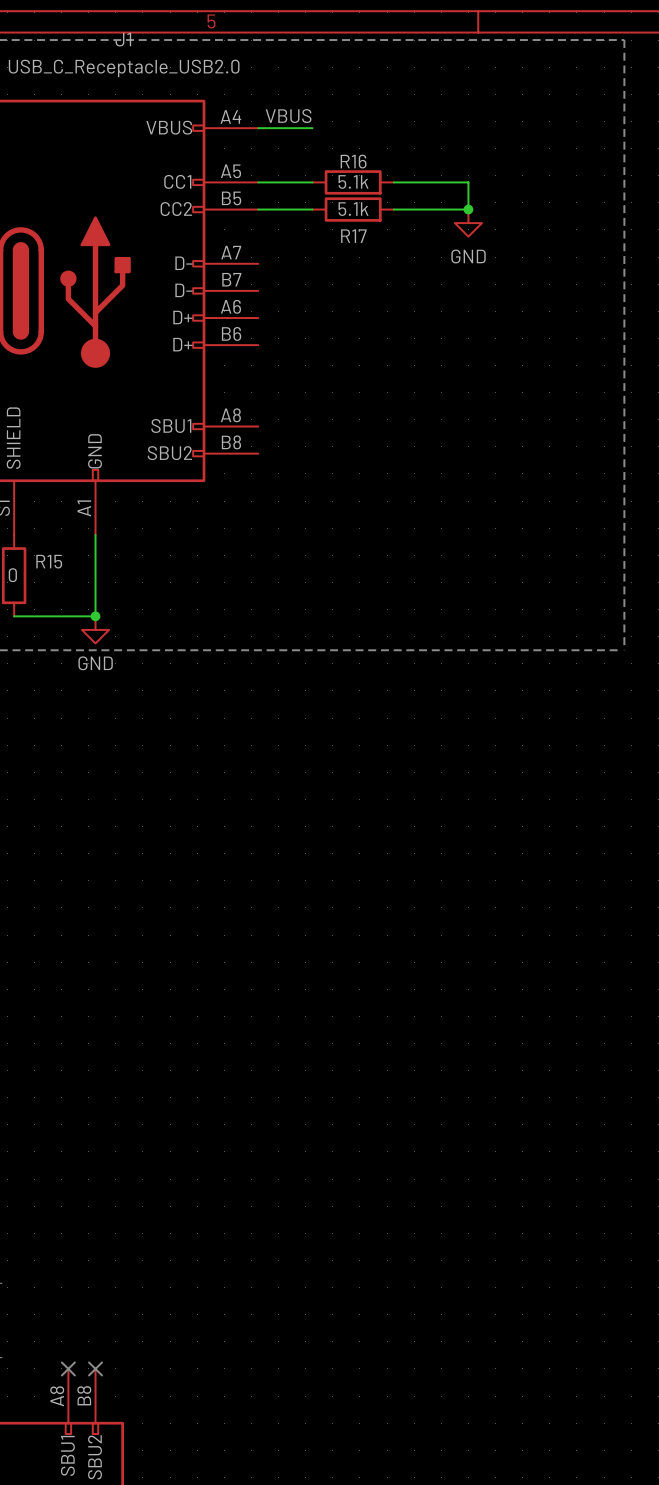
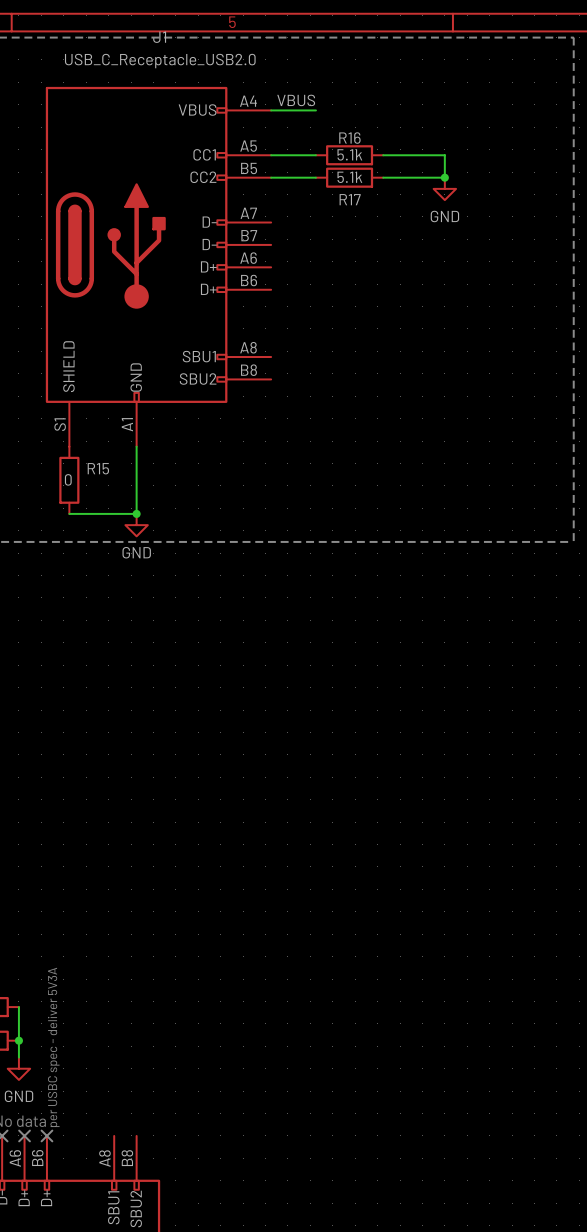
no-connect mark: (68, 1368) -> none
no-connect mark: (95, 1368) -> none

